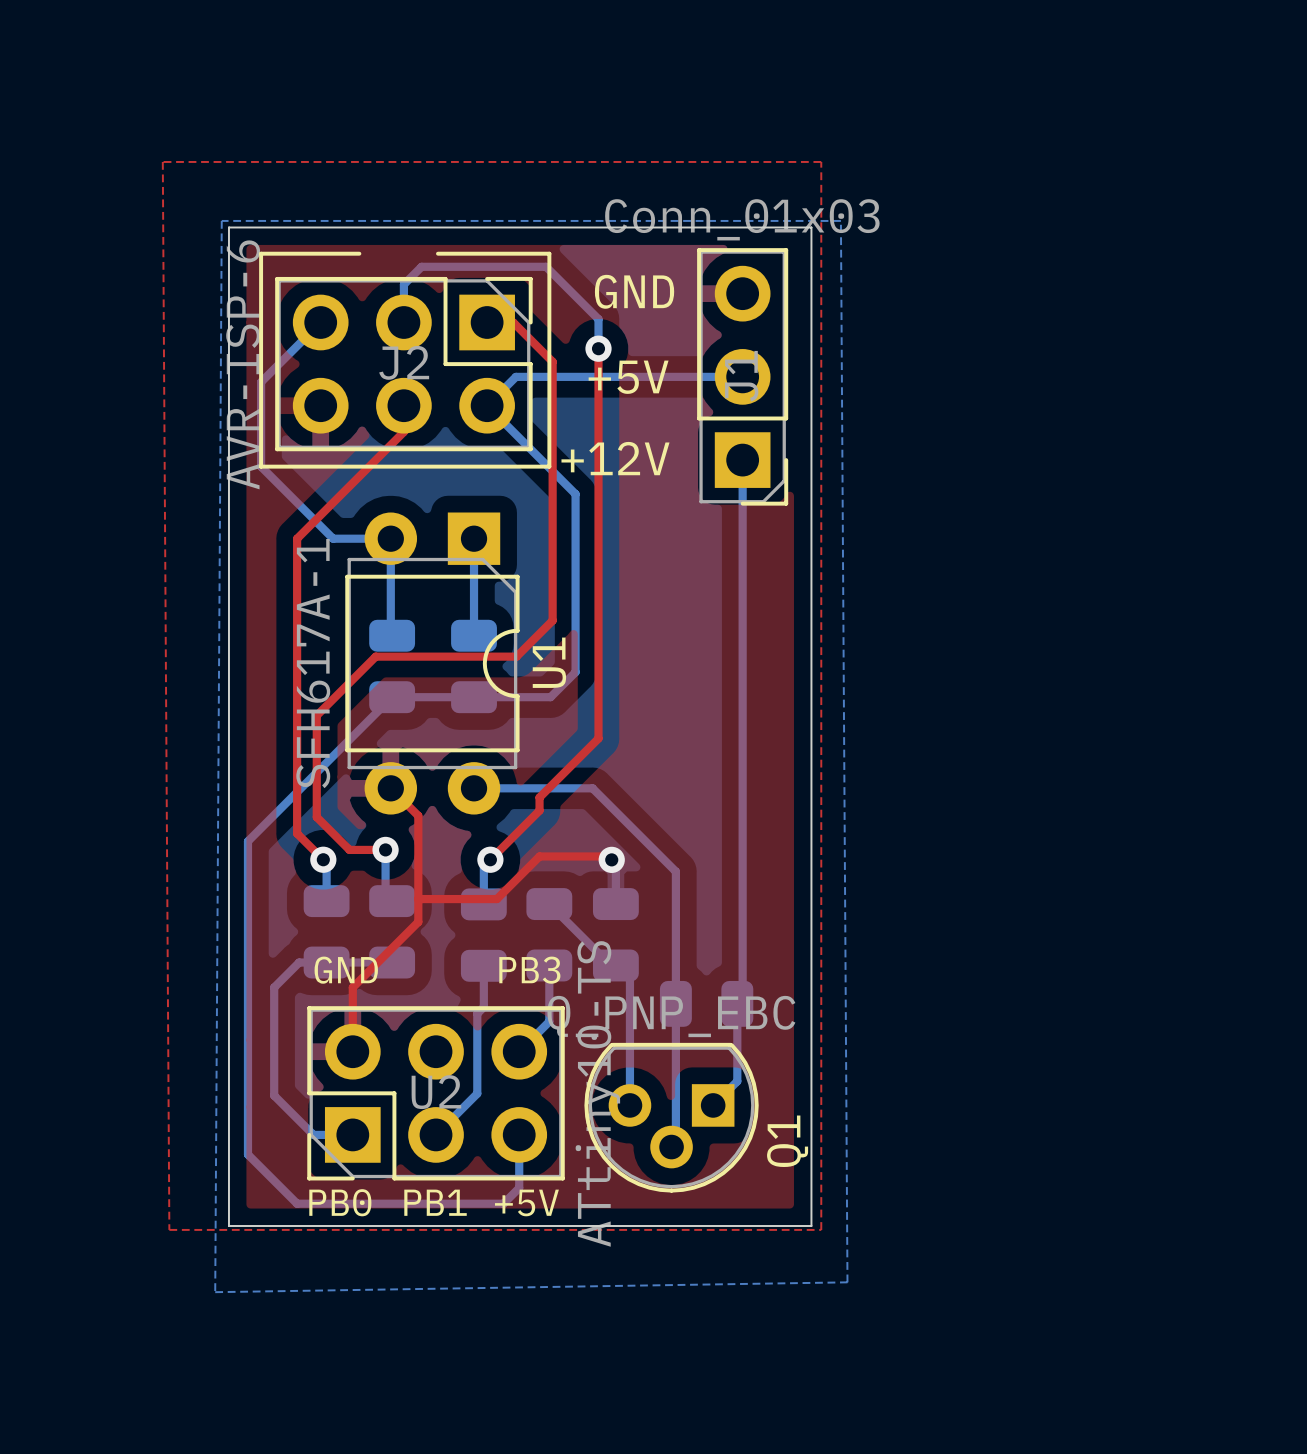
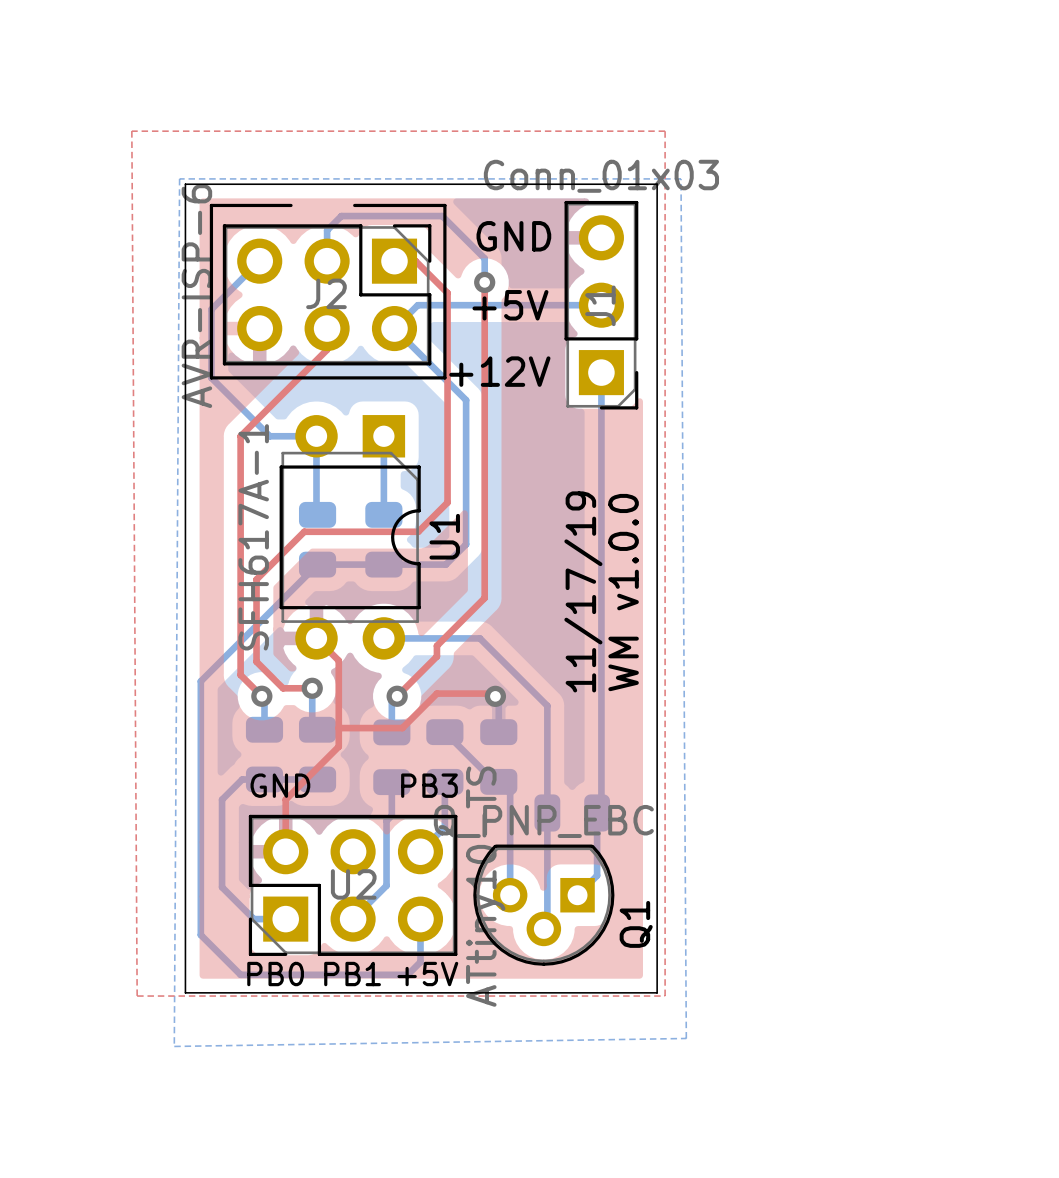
text: none -> 11/17/19 (583, 591)
text: none -> WM v1.0.0 (623, 592)

